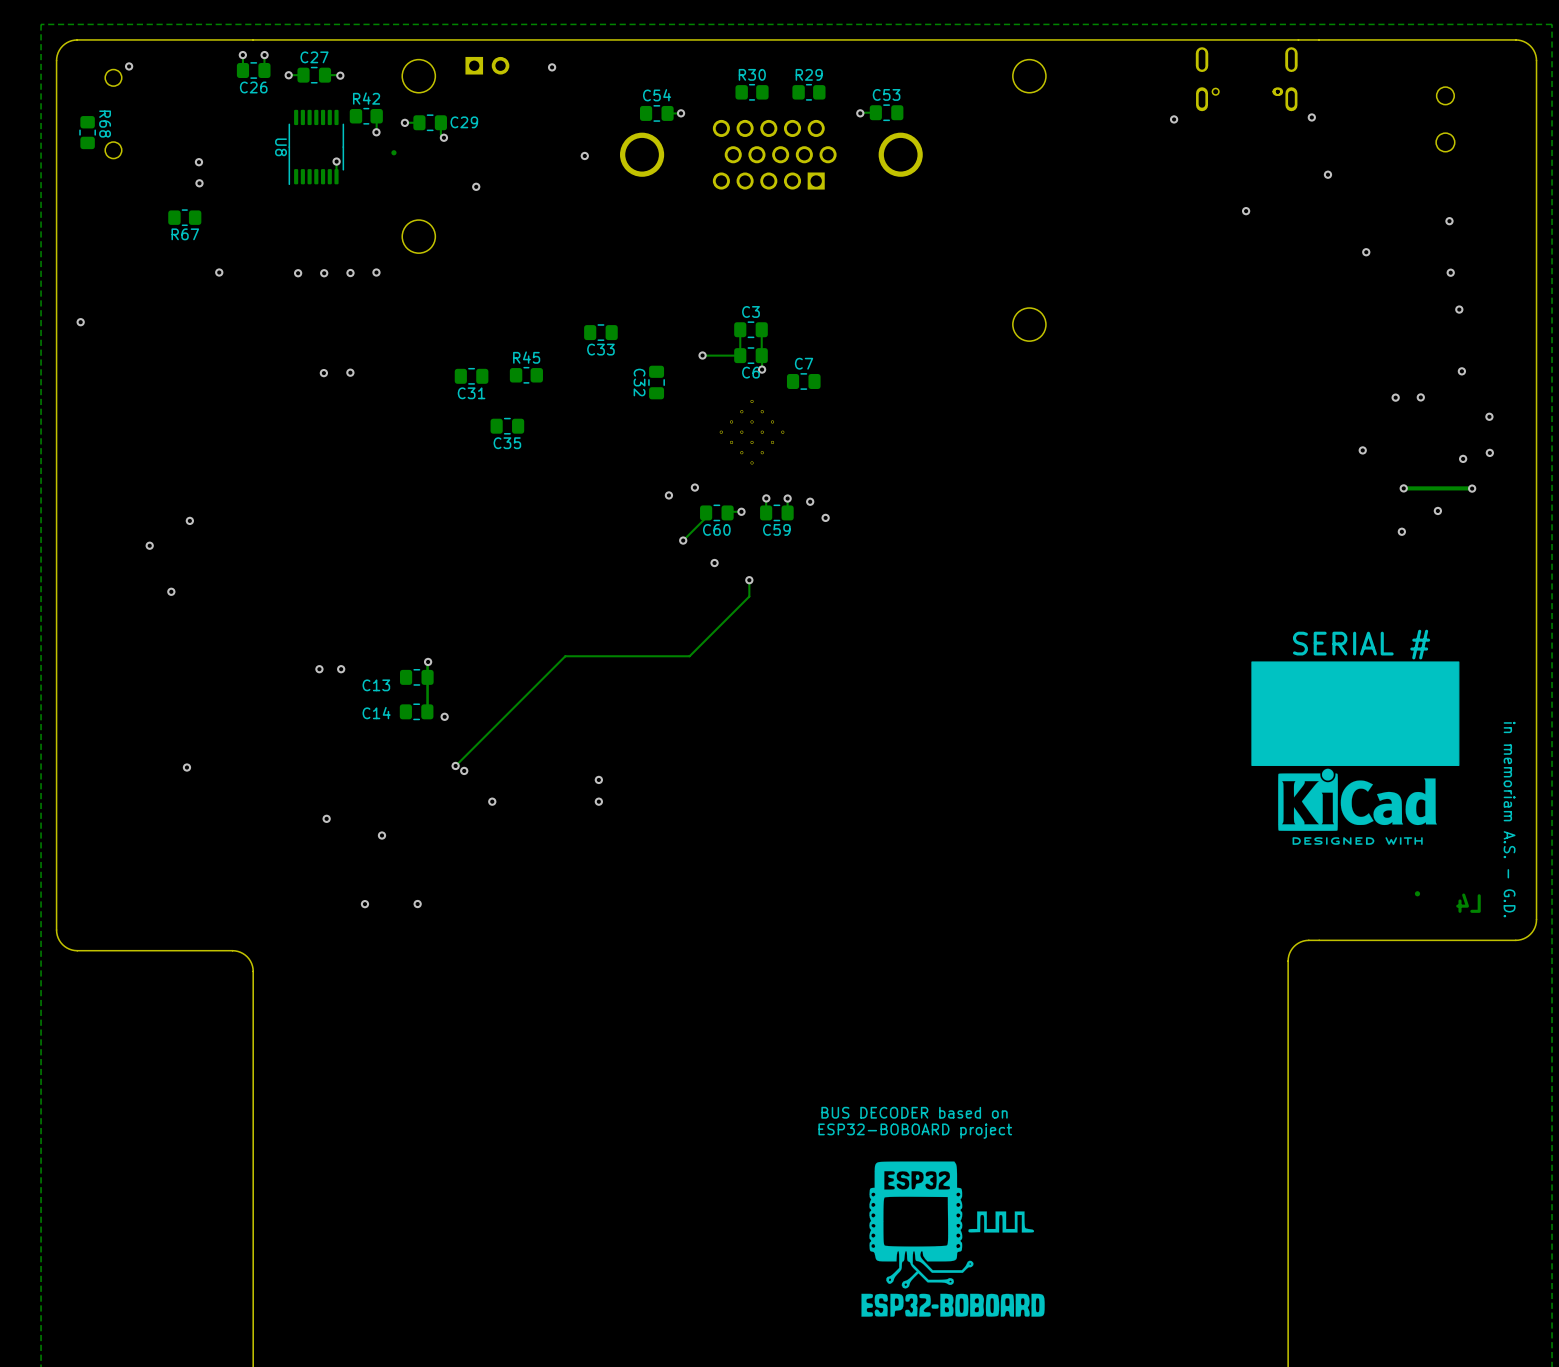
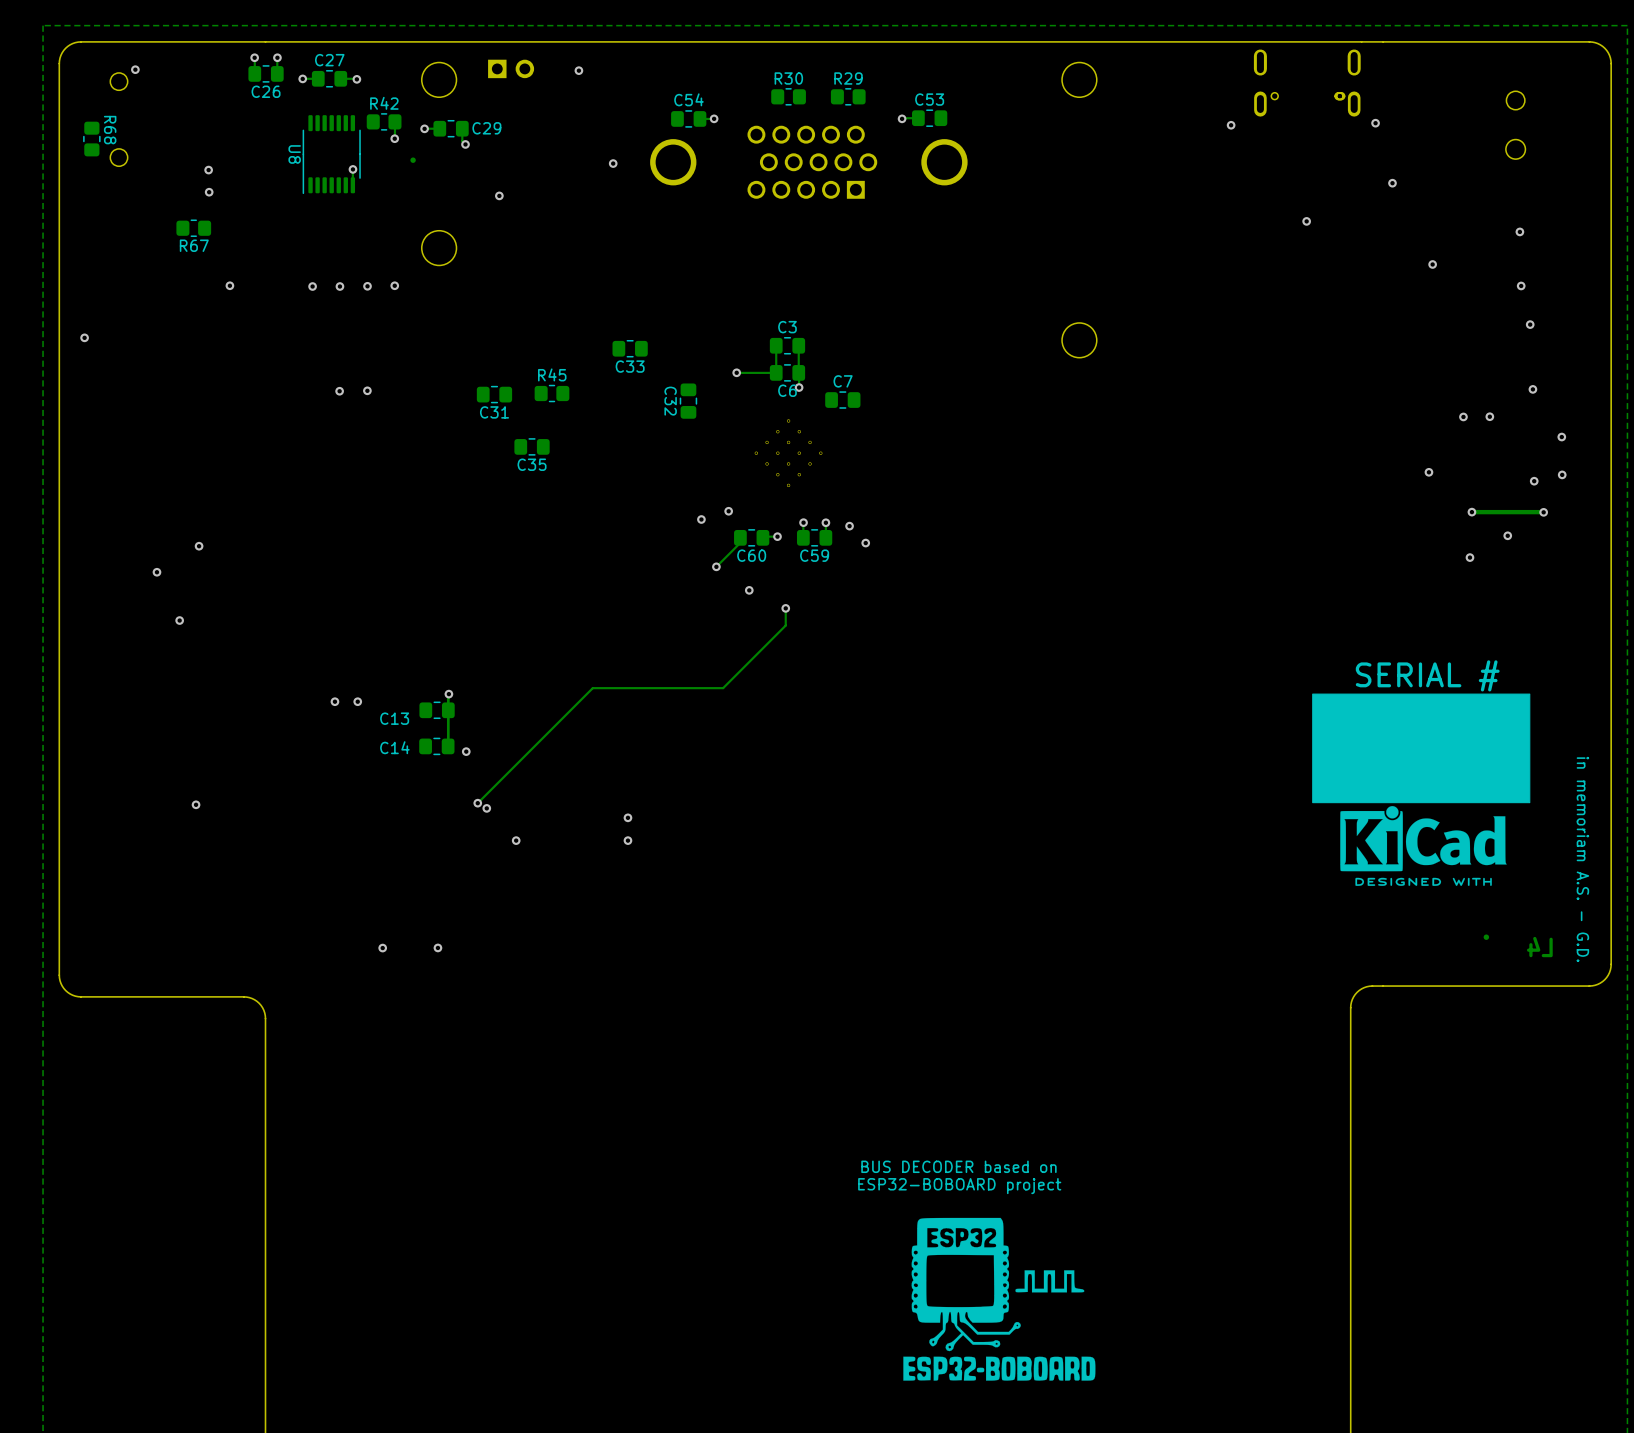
via: (326, 818) -> none
via: (381, 835) -> none

